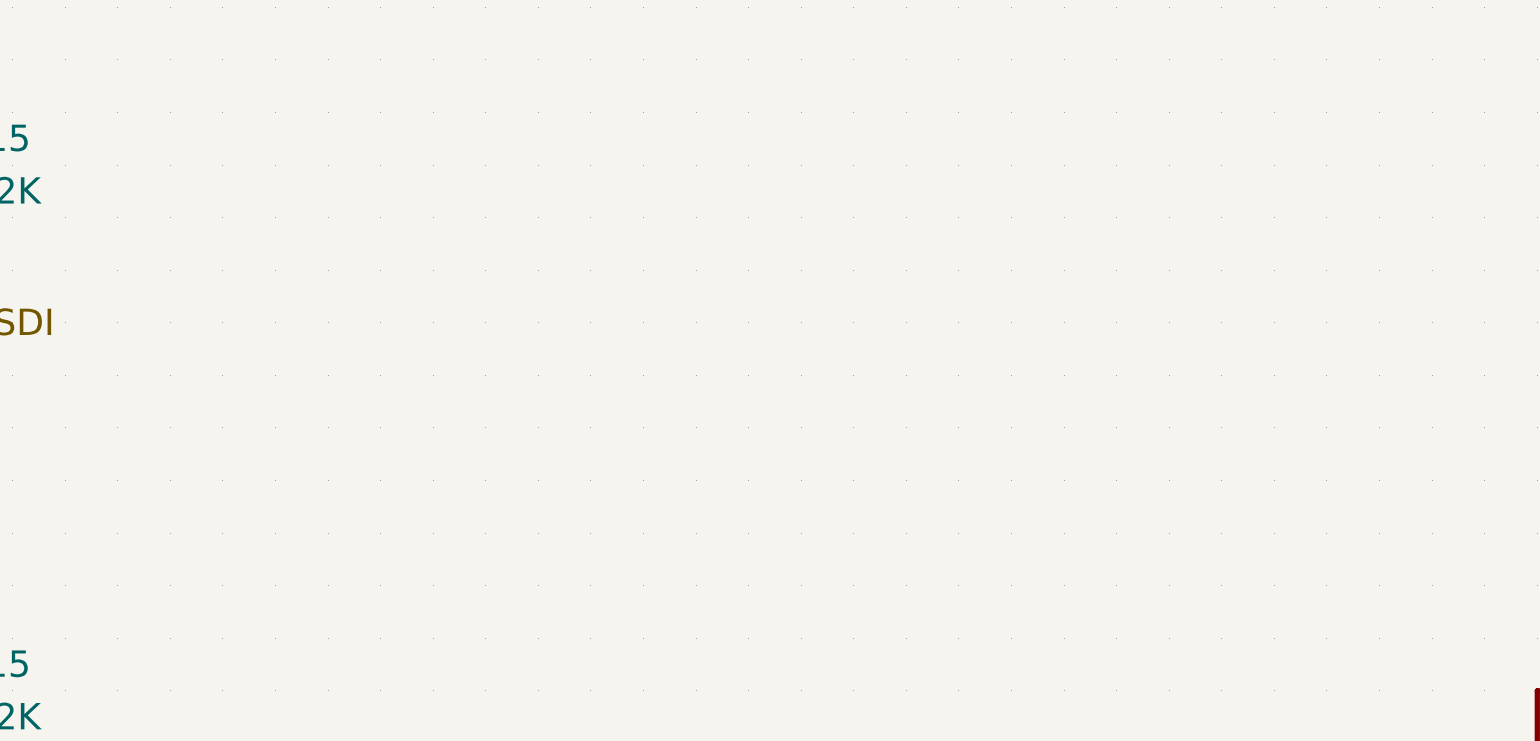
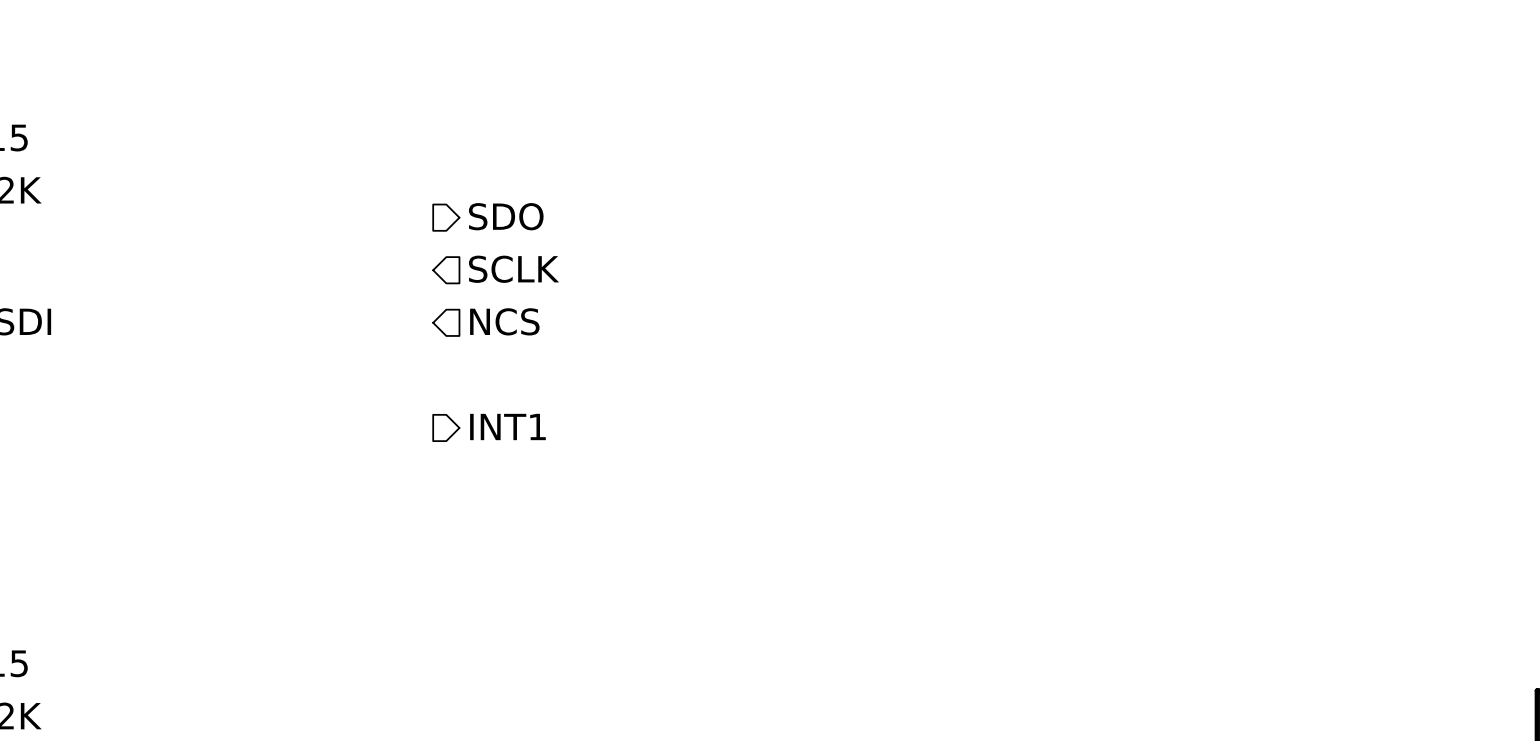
hierarchical label: none -> SDO (506, 216)
hierarchical label: none -> SCLK (514, 269)
hierarchical label: none -> NCS (504, 321)
hierarchical label: none -> INT1 (507, 427)

